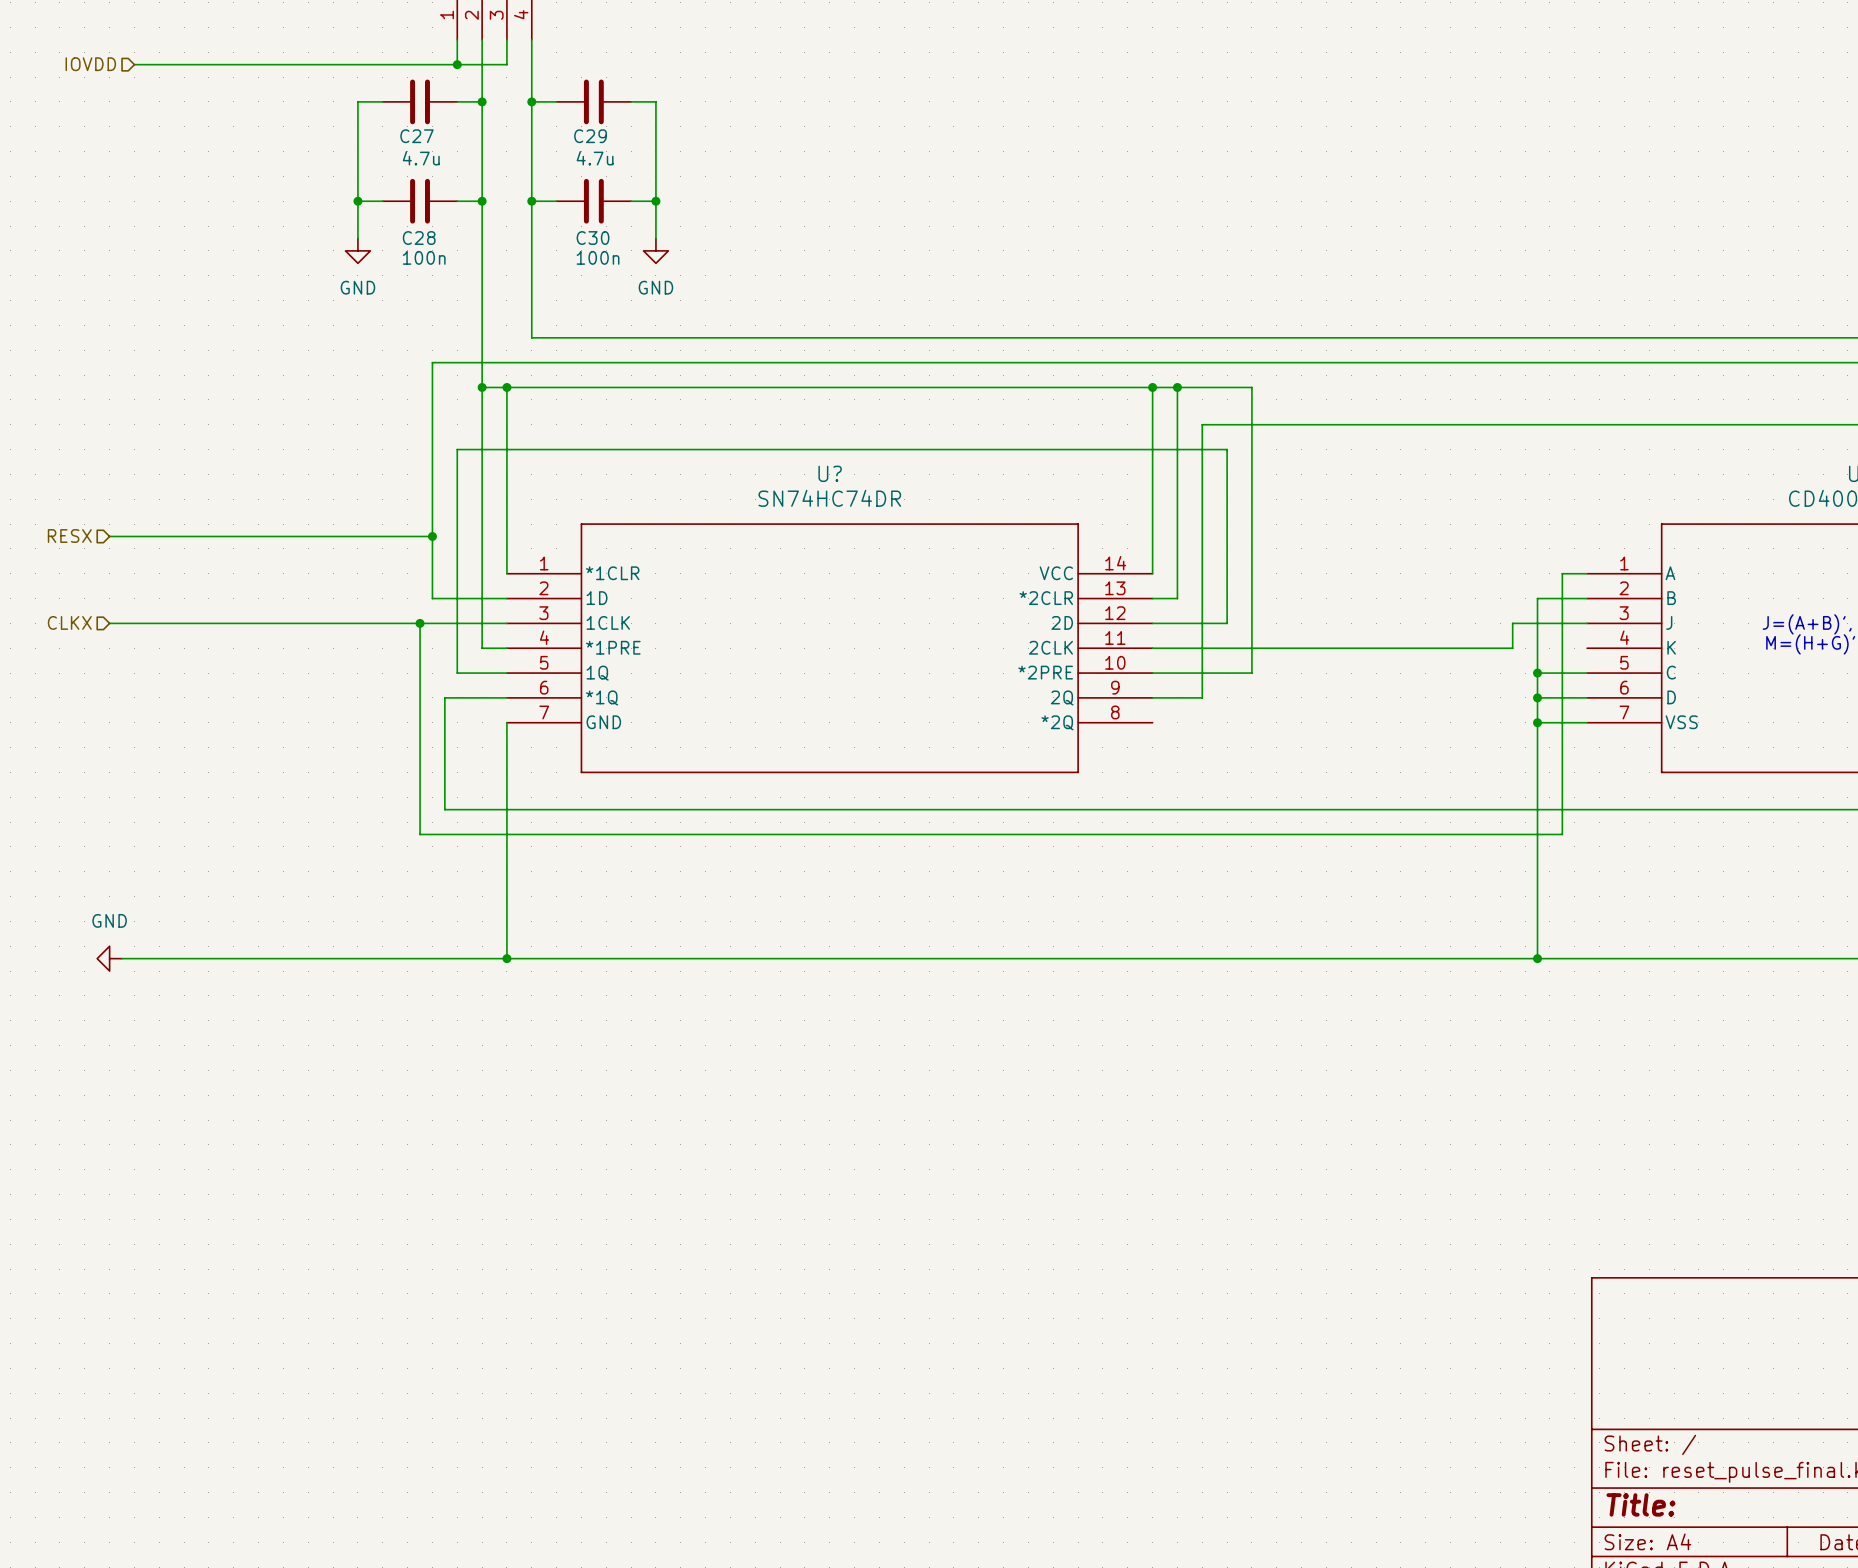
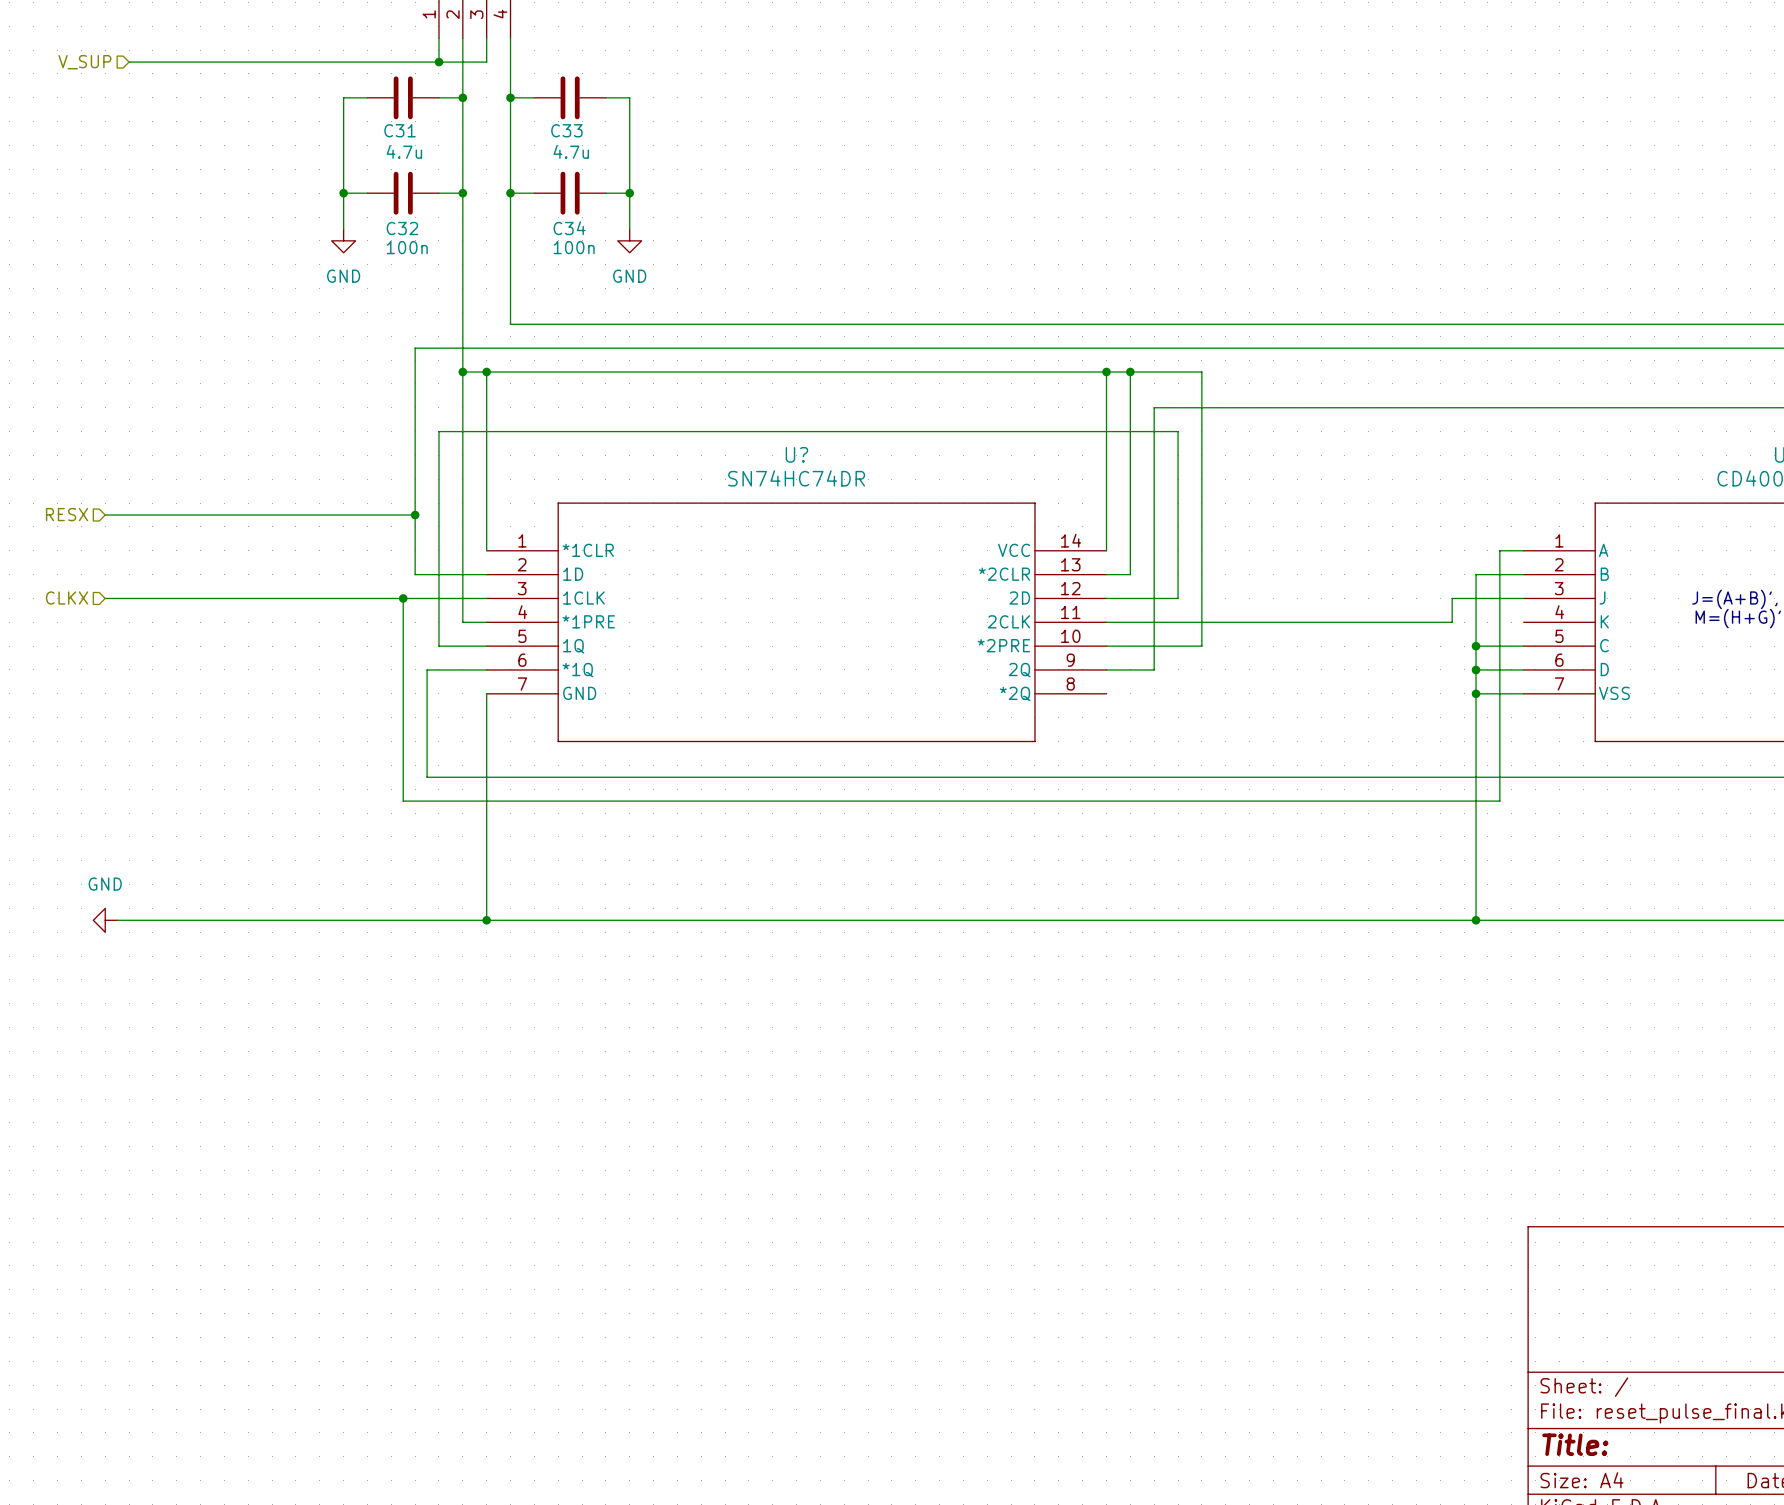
hierarchical label: IOVDD (90, 64) -> V_SUP (84, 62)
C27 name: C27 (416, 136) -> C31 (400, 130)
C29 name: C29 (590, 136) -> C33 (566, 130)
C28 name: C28 (419, 238) -> C32 (402, 228)
C30 name: C30 (593, 238) -> C34 (569, 228)

